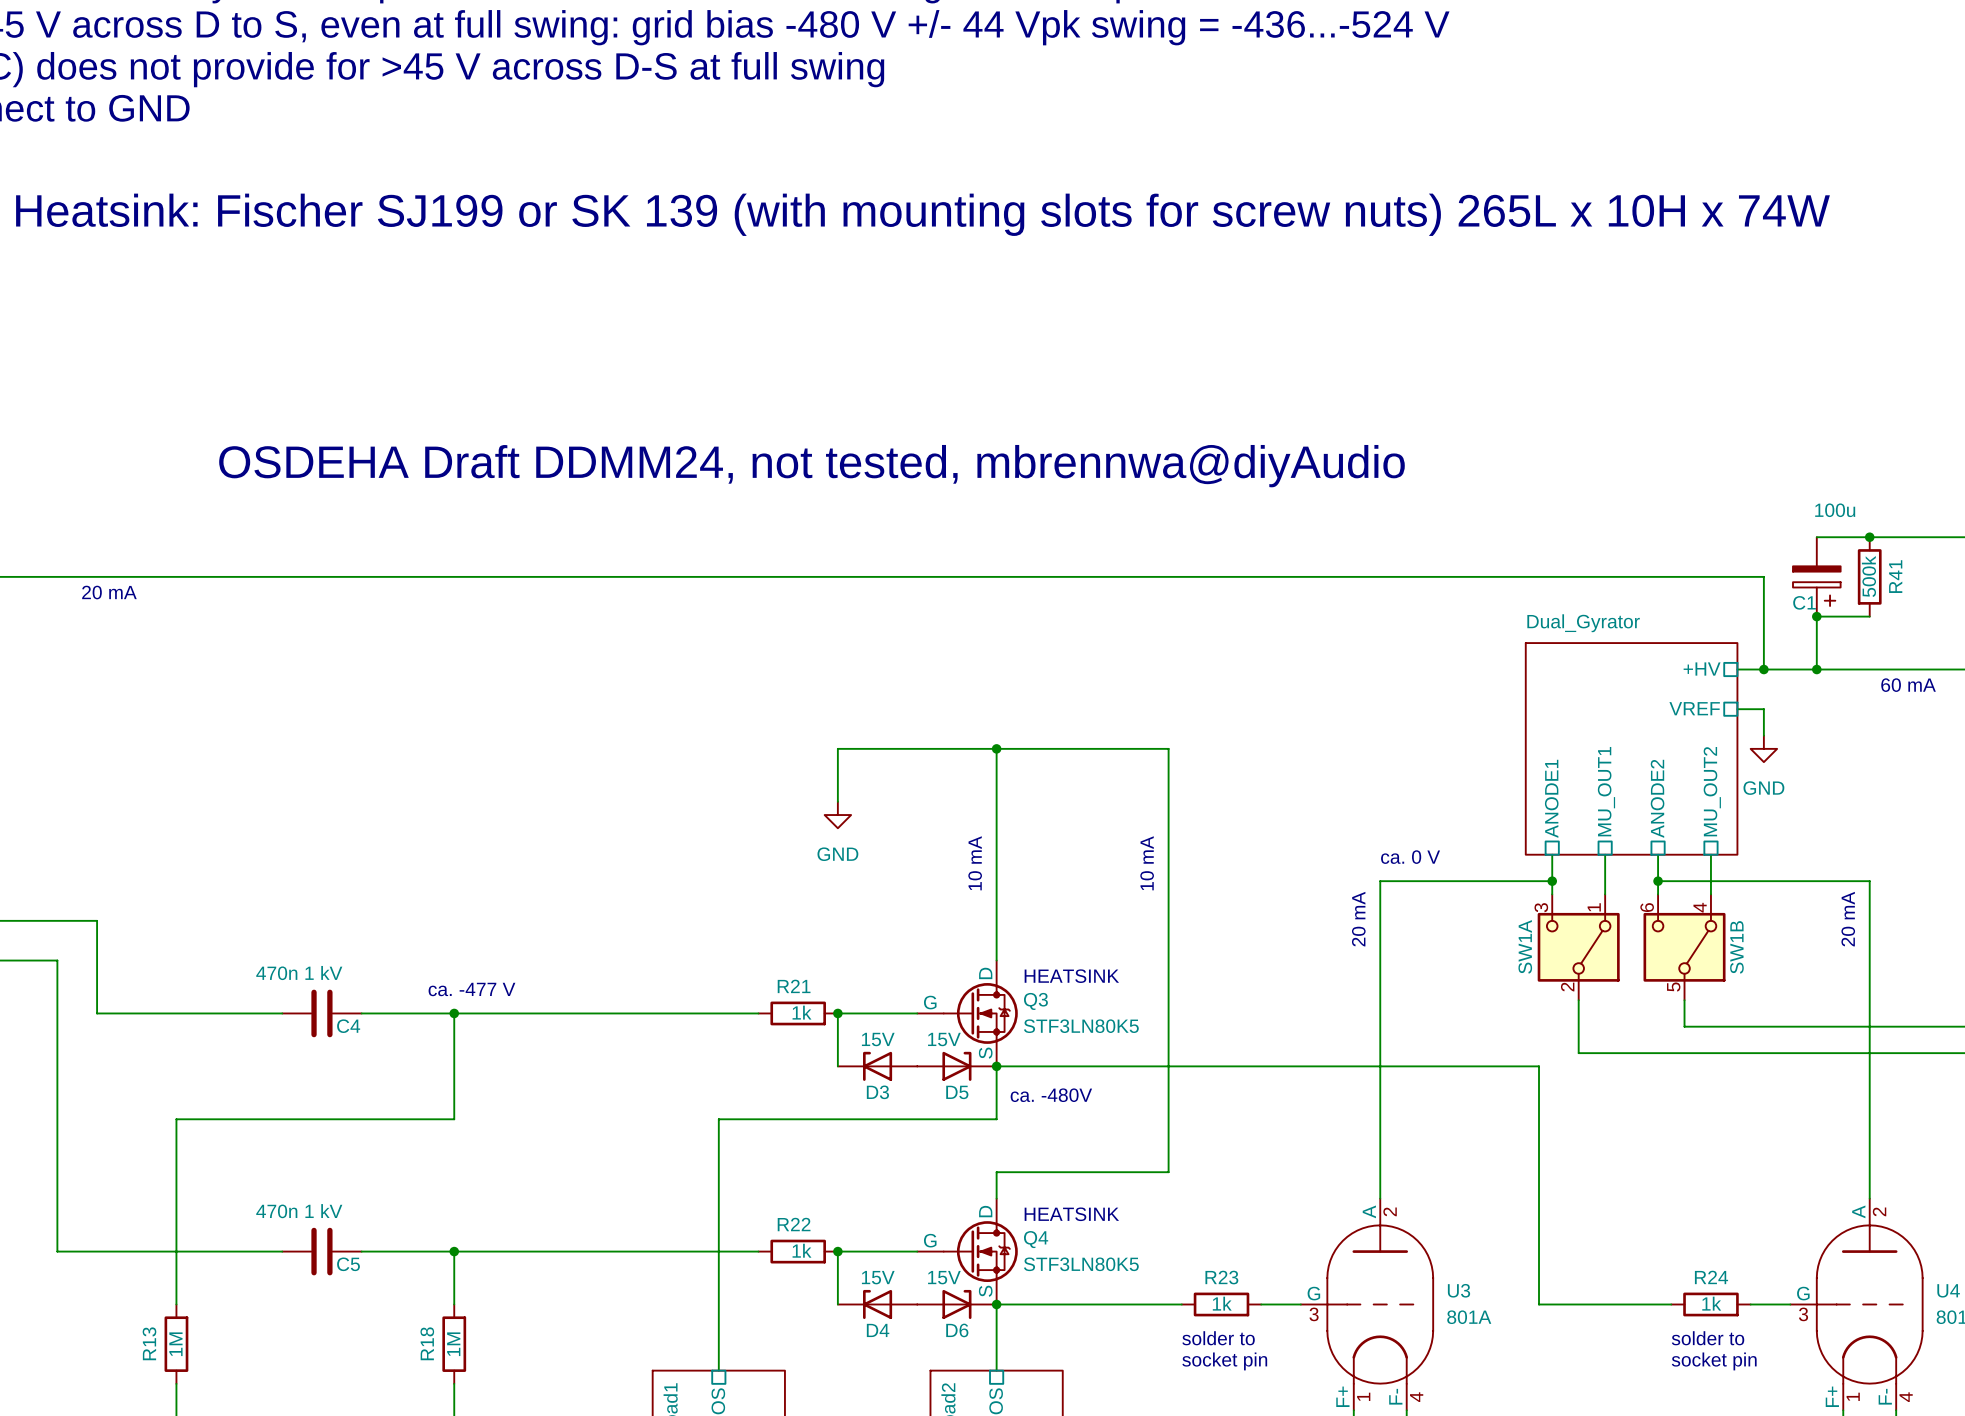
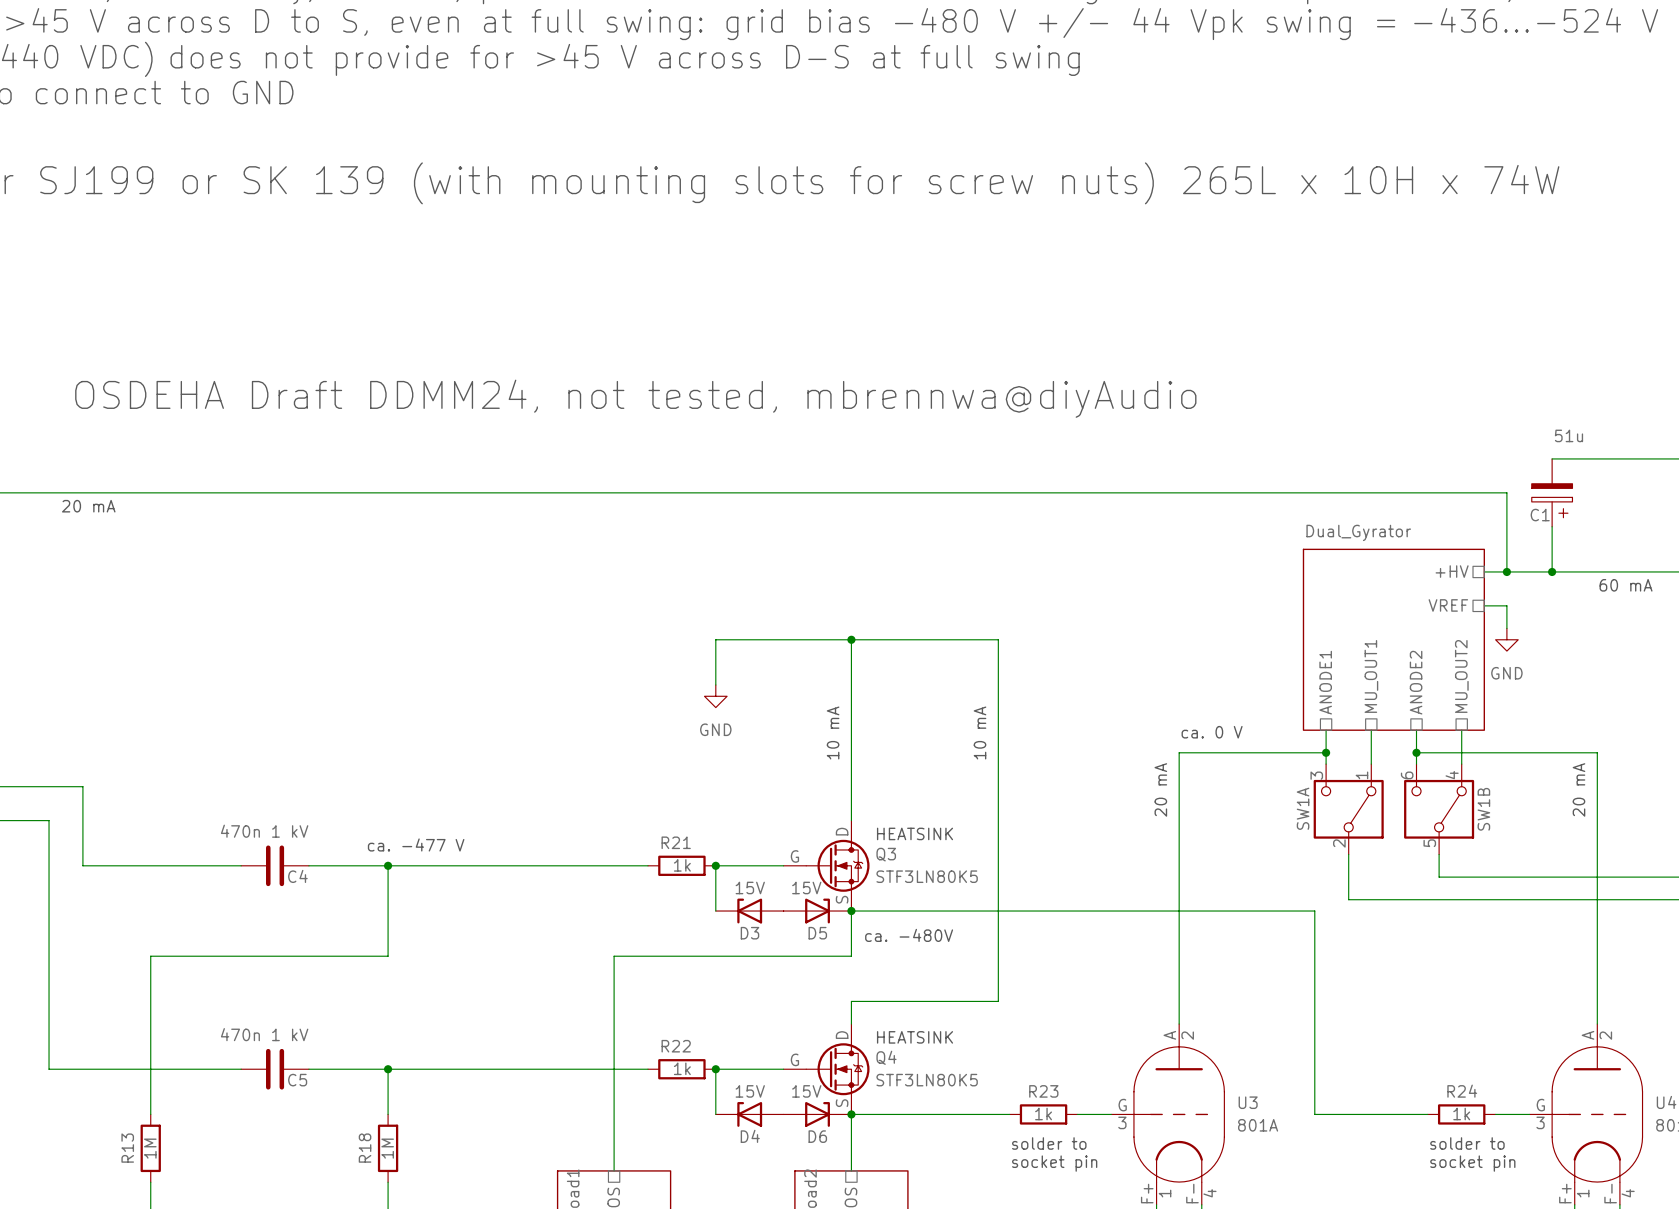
C1 value: 100u (1835, 510) -> 51u (1568, 435)
junction: (1869, 537) -> none
R41: 500k (1869, 576) -> none
wire: (1816, 616) (1869, 616) -> none
junction: (1816, 616) -> none

